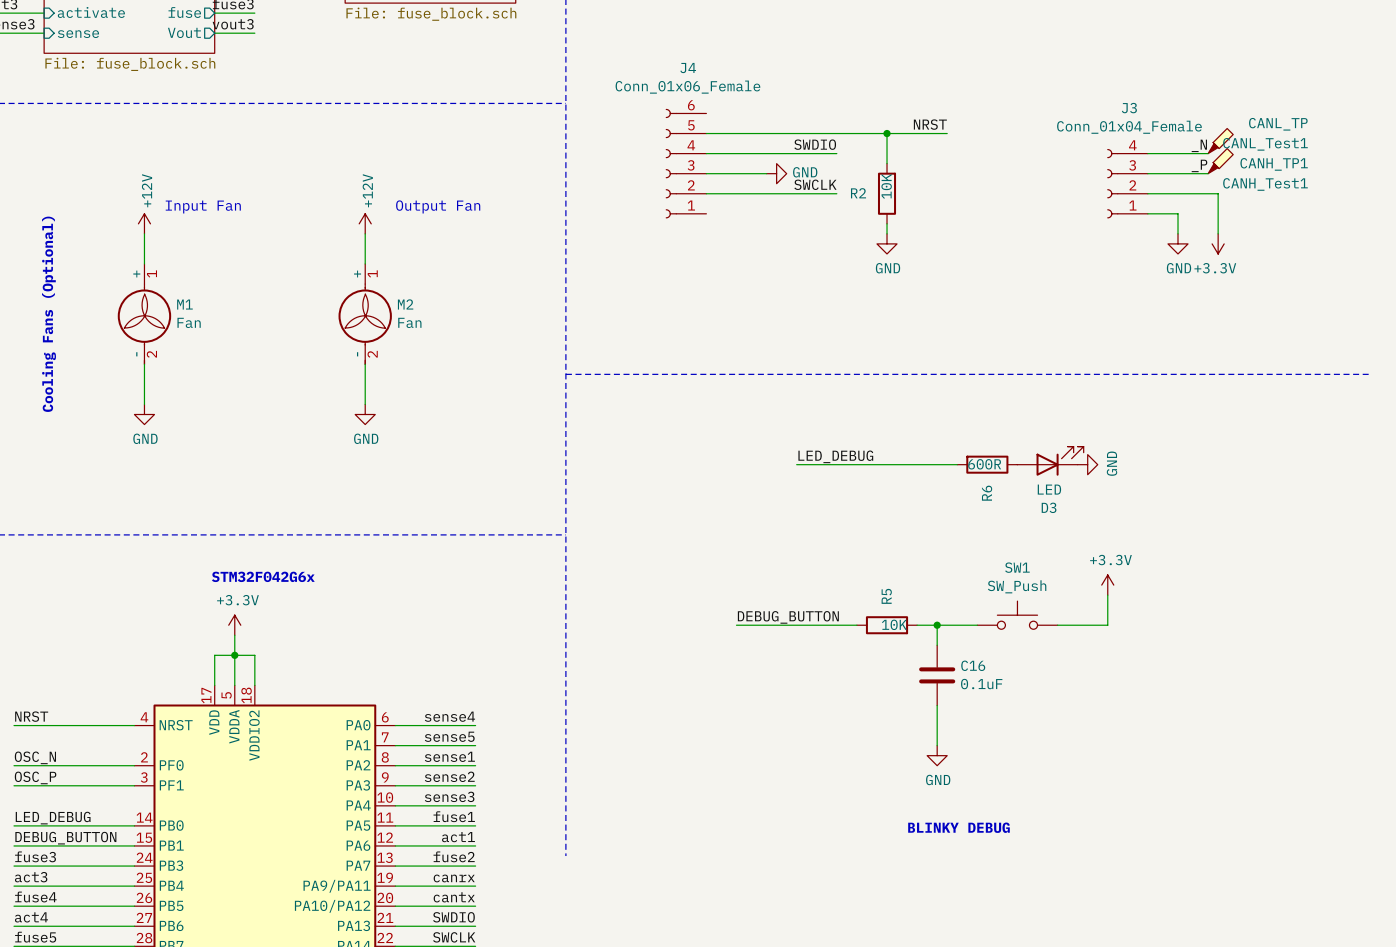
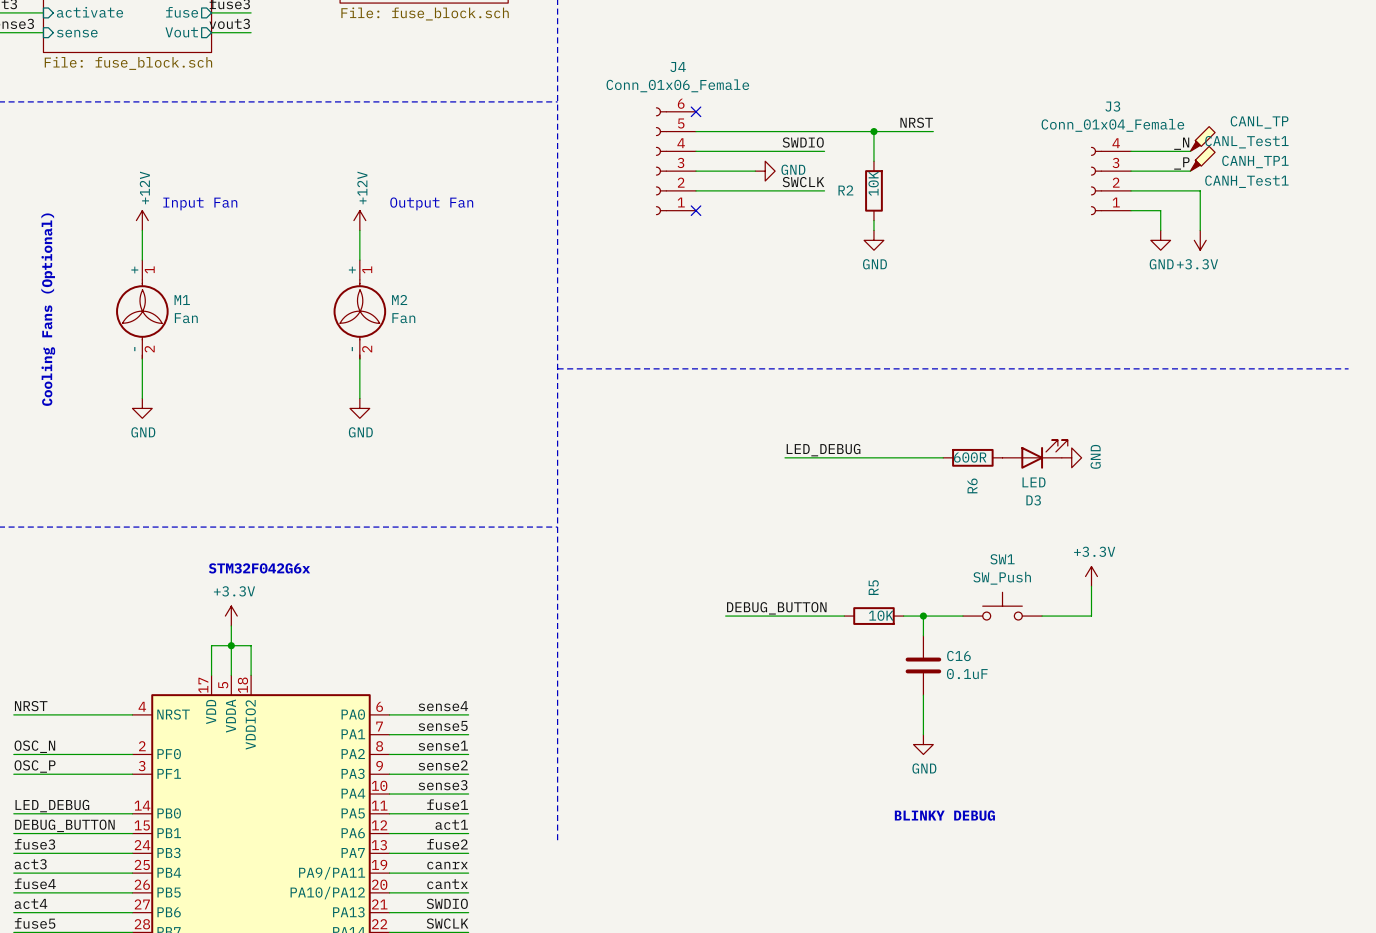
no-connect mark: none -> (696, 111)
no-connect mark: none -> (696, 210)

